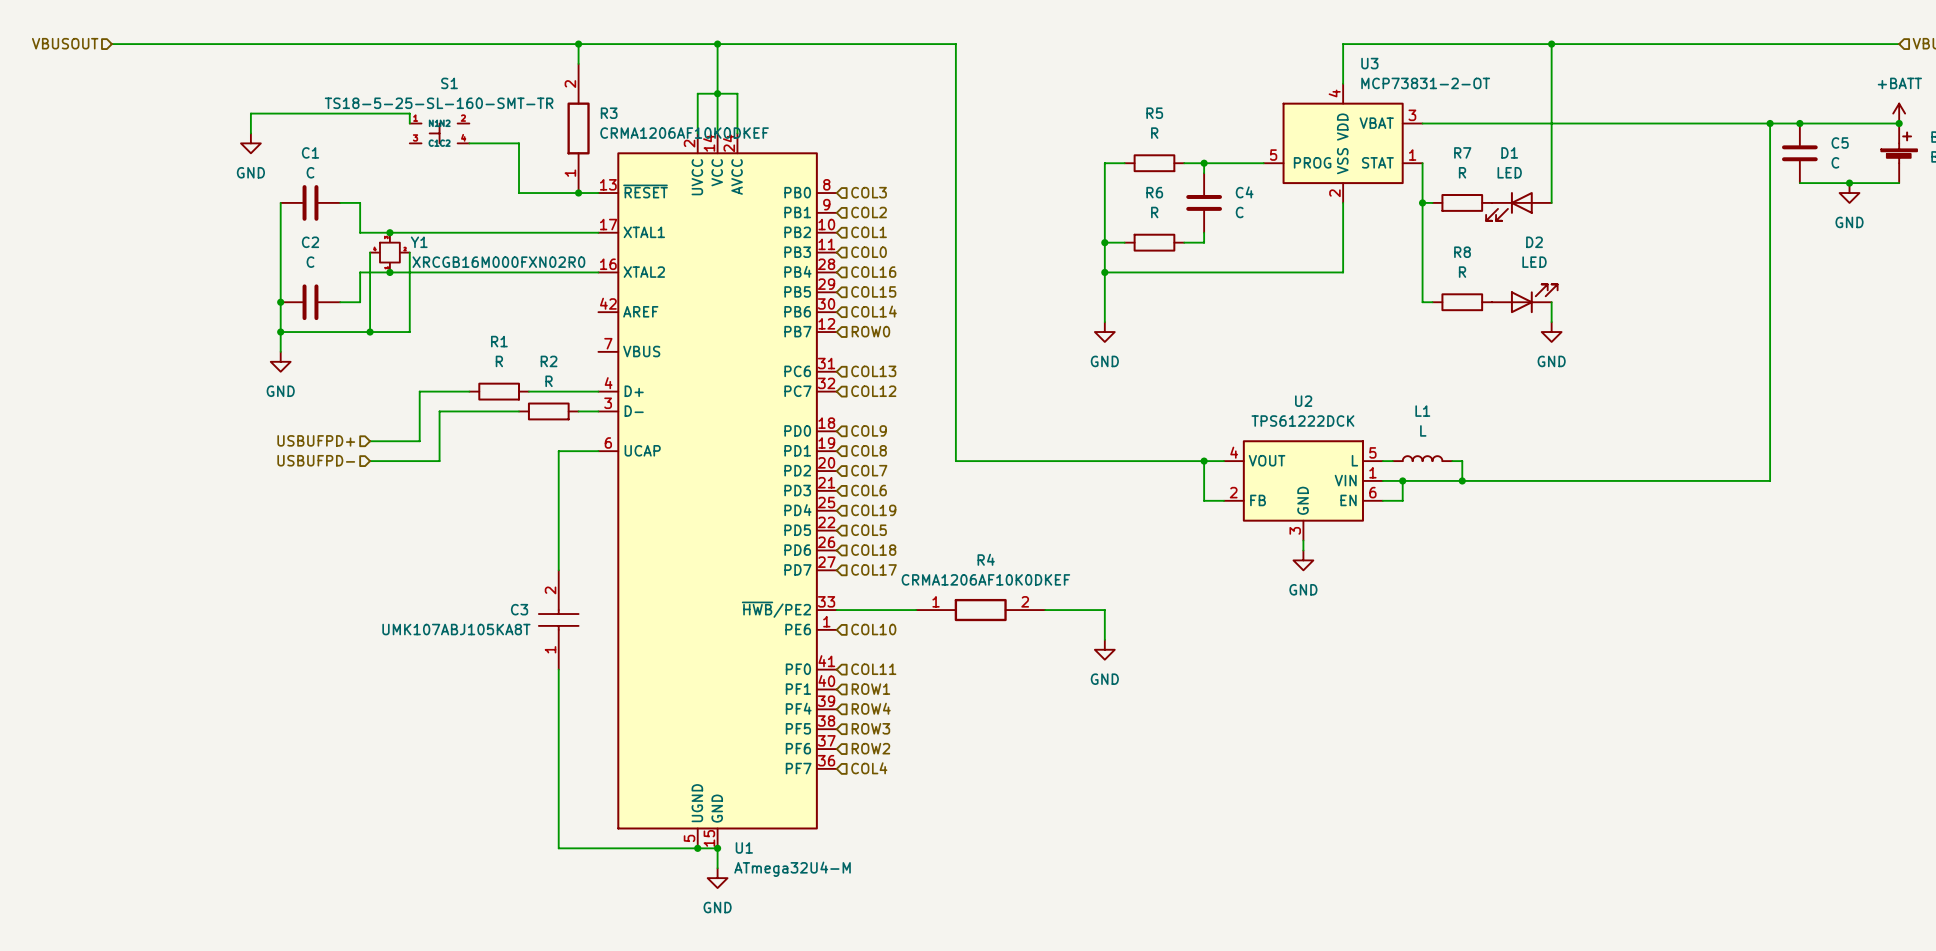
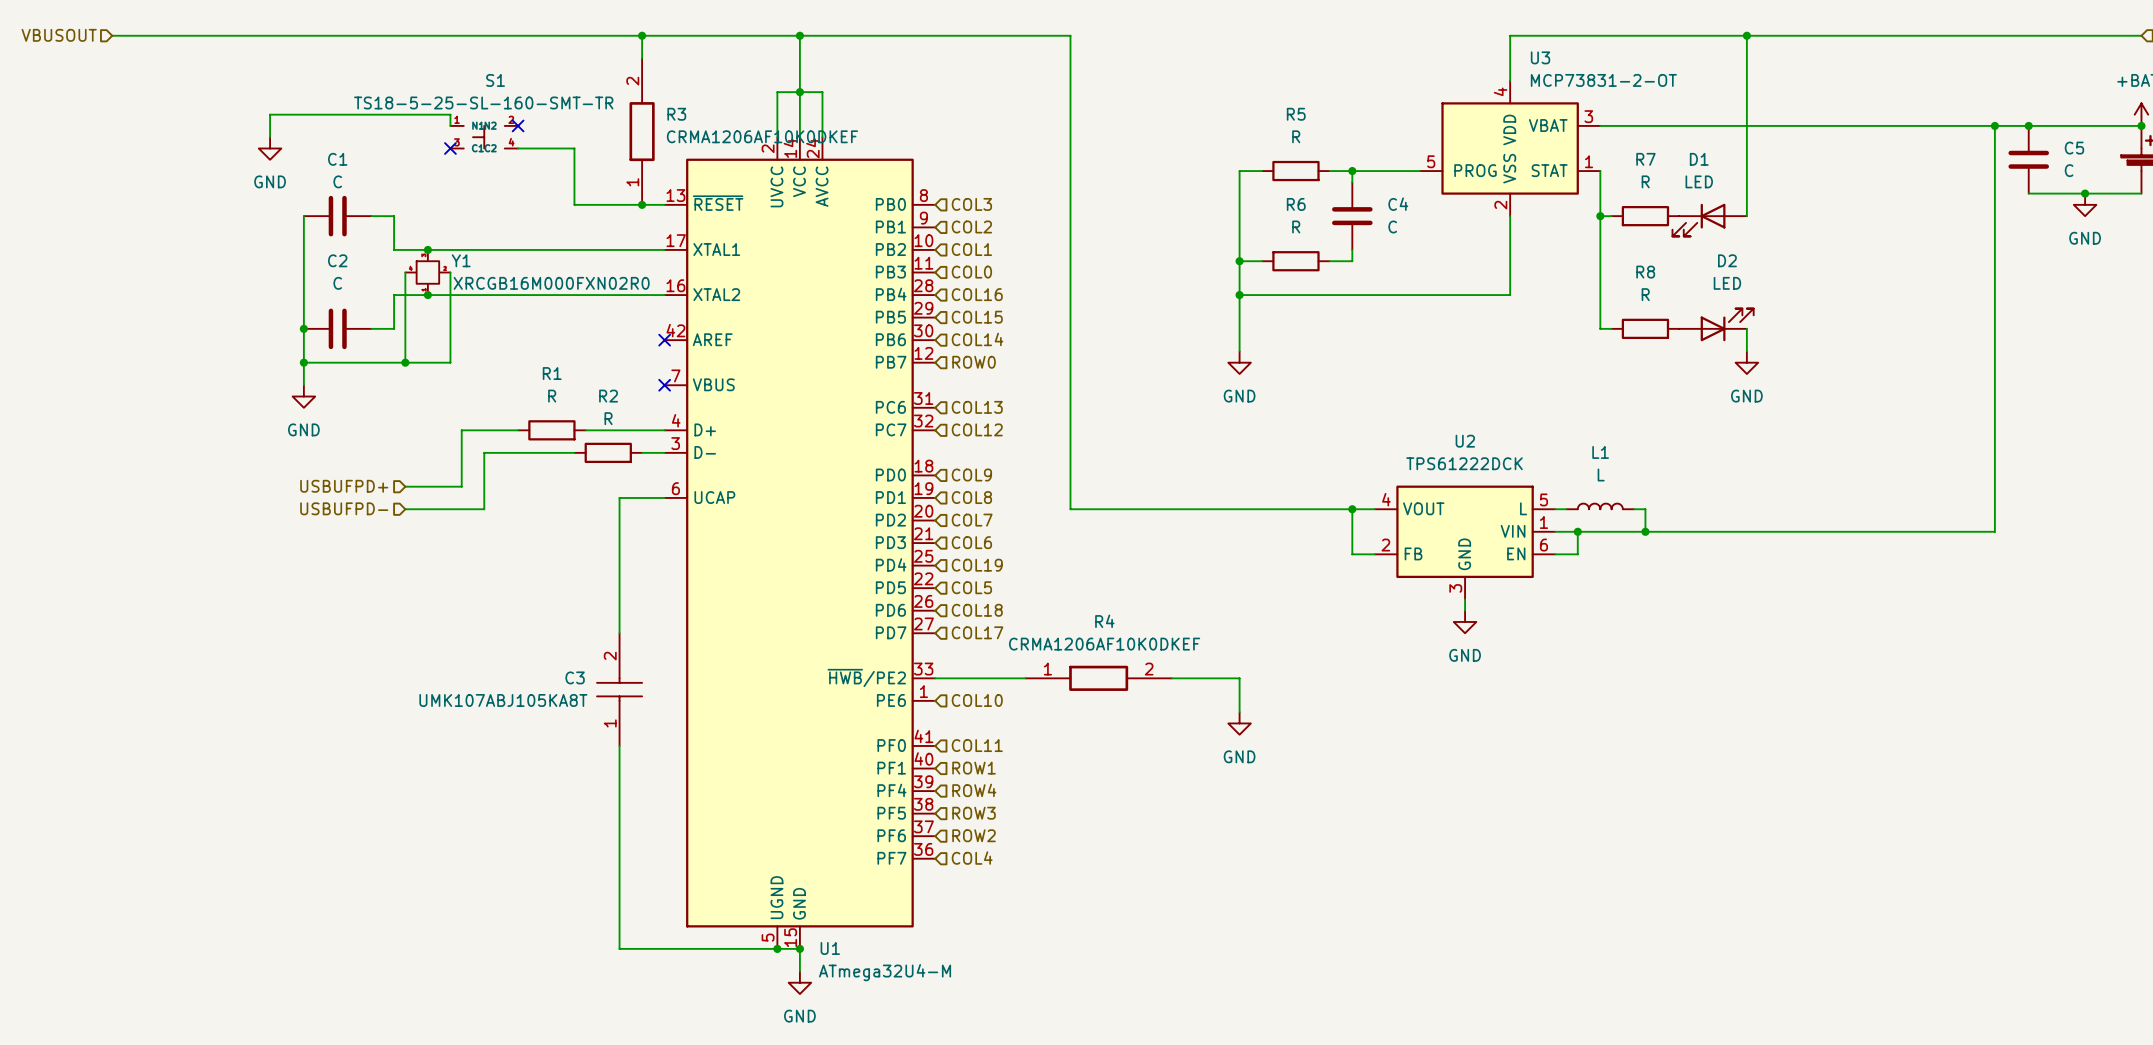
no-connect mark: none -> (518, 125)
no-connect mark: none -> (450, 148)
no-connect mark: none -> (664, 340)
no-connect mark: none -> (664, 385)

